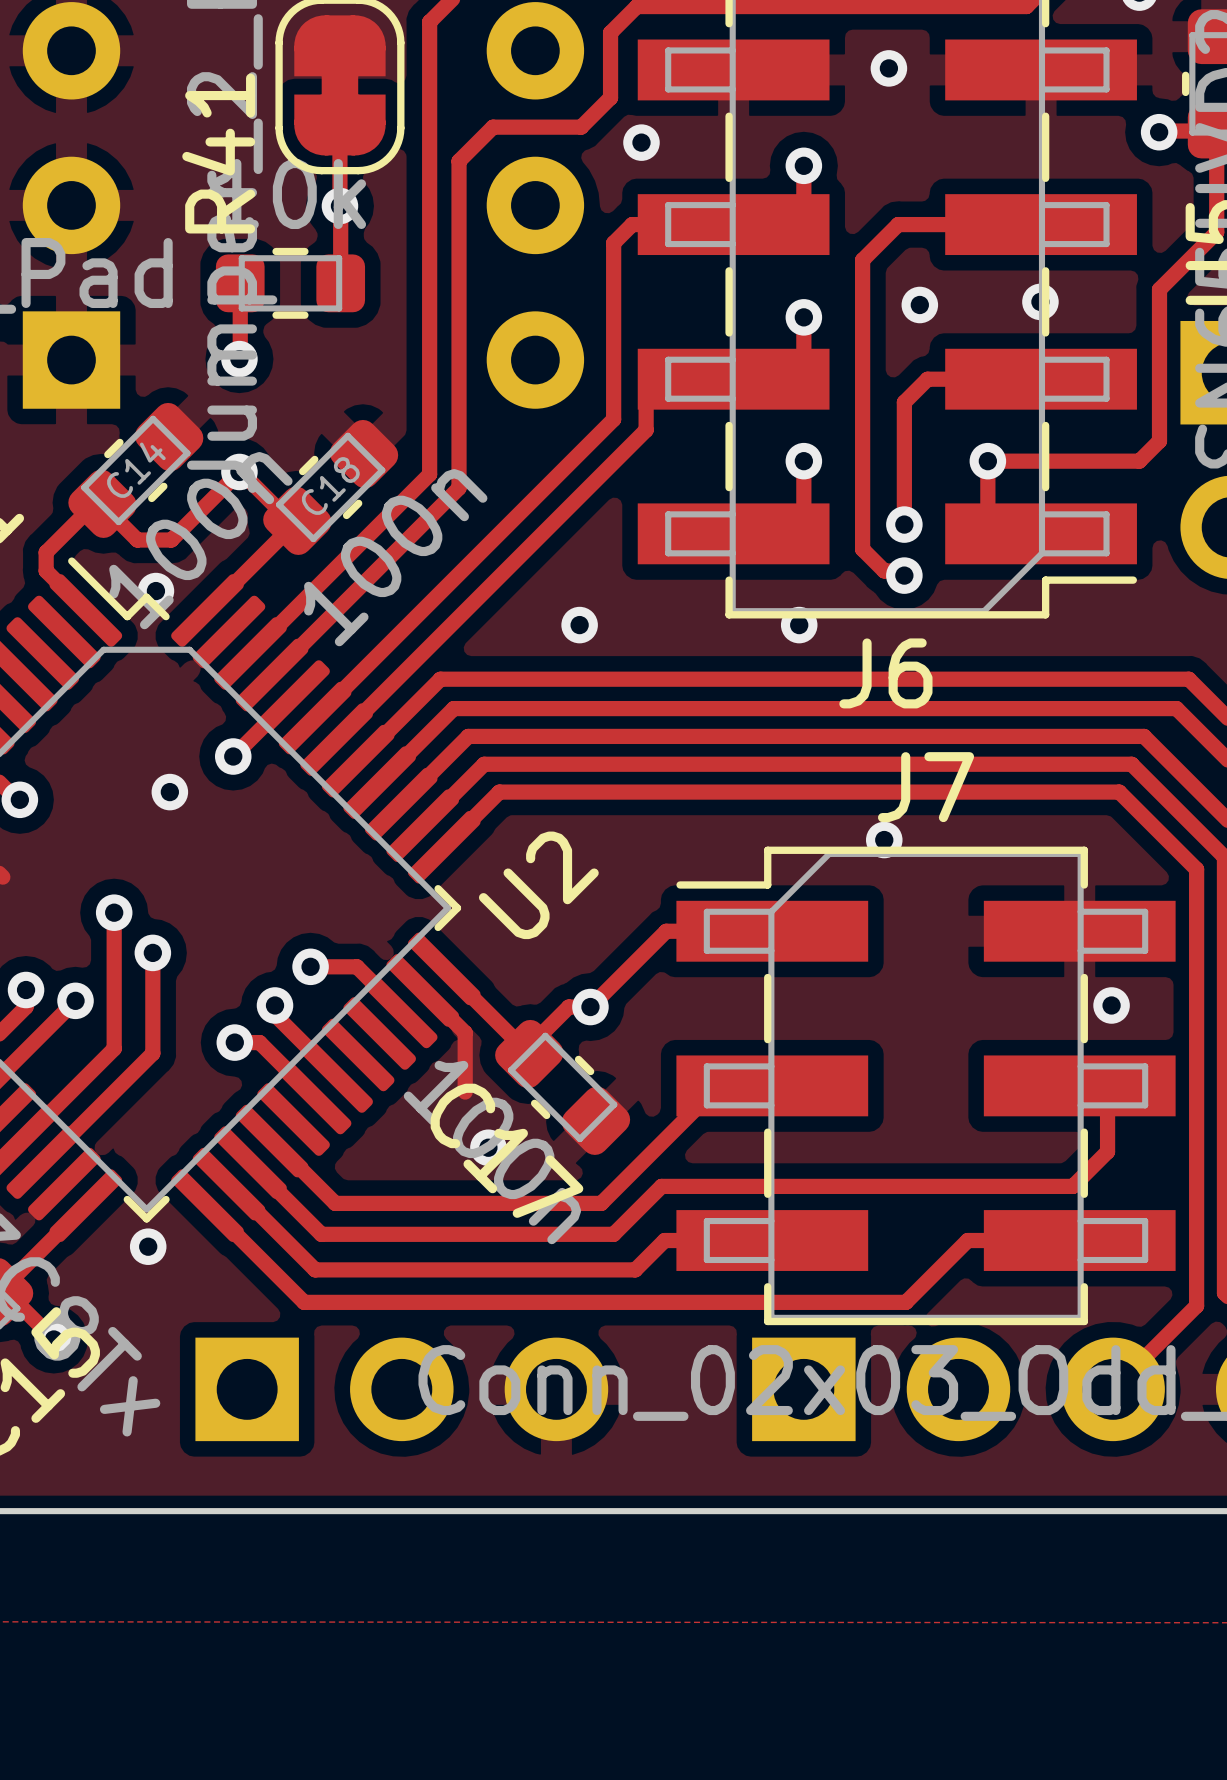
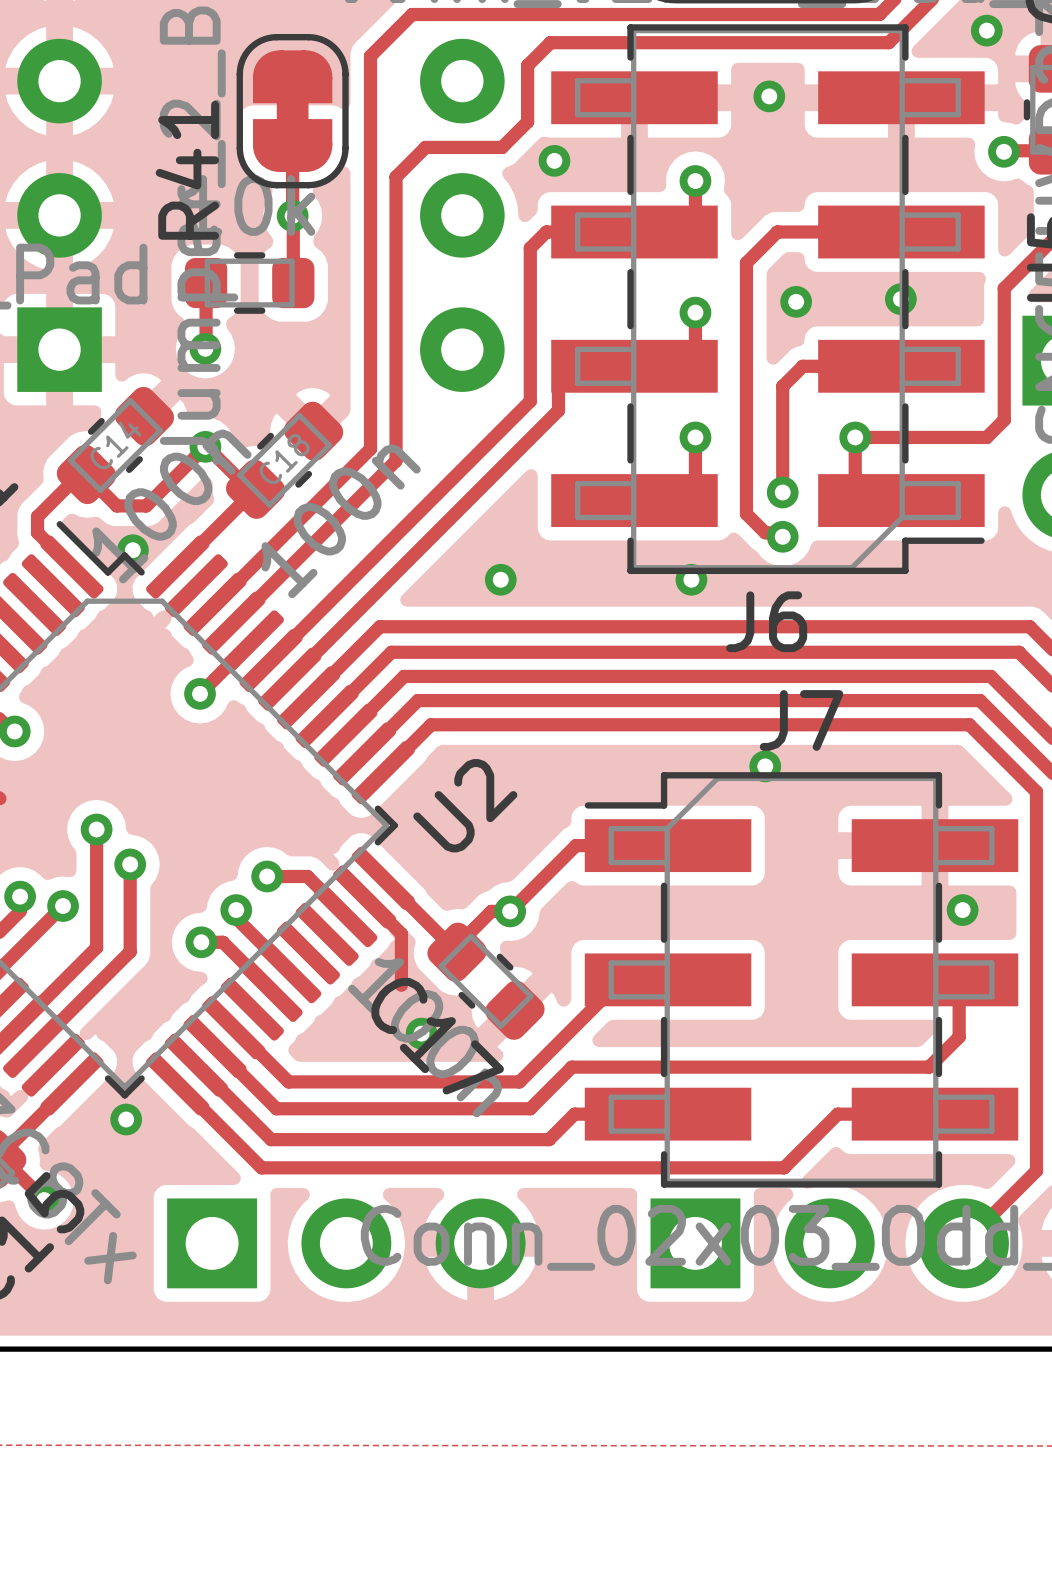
via: (169, 792) -> none

